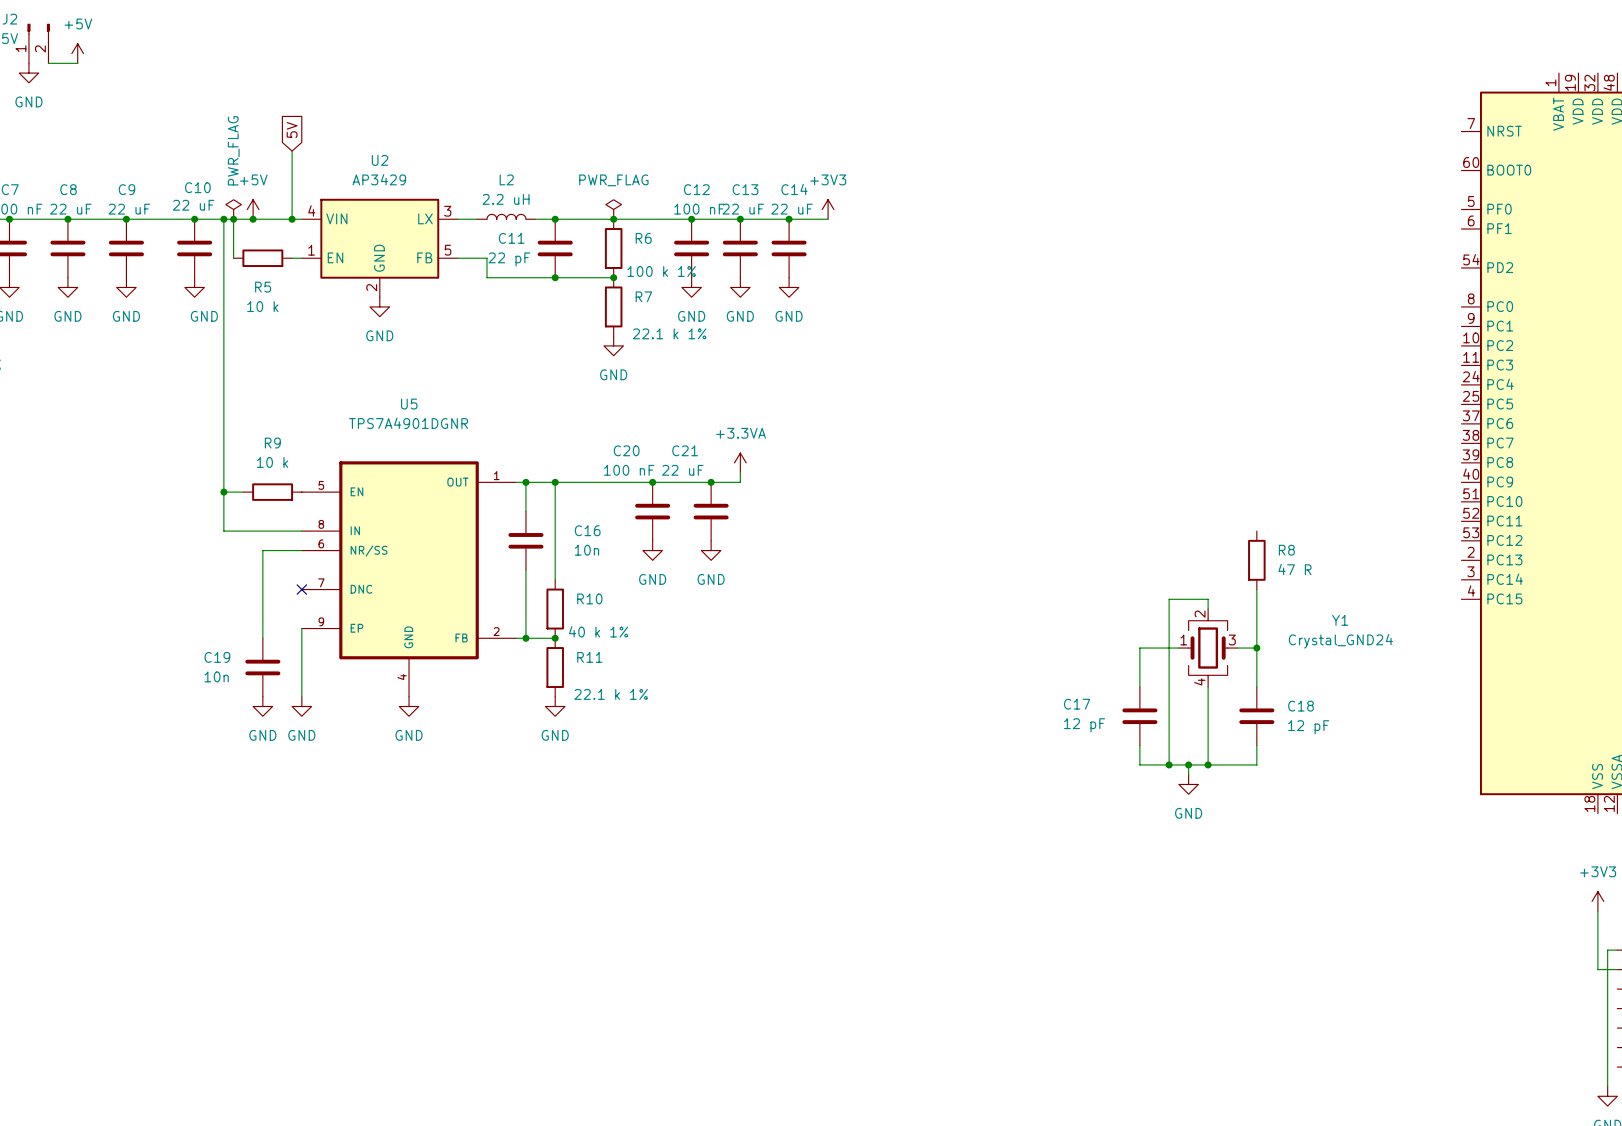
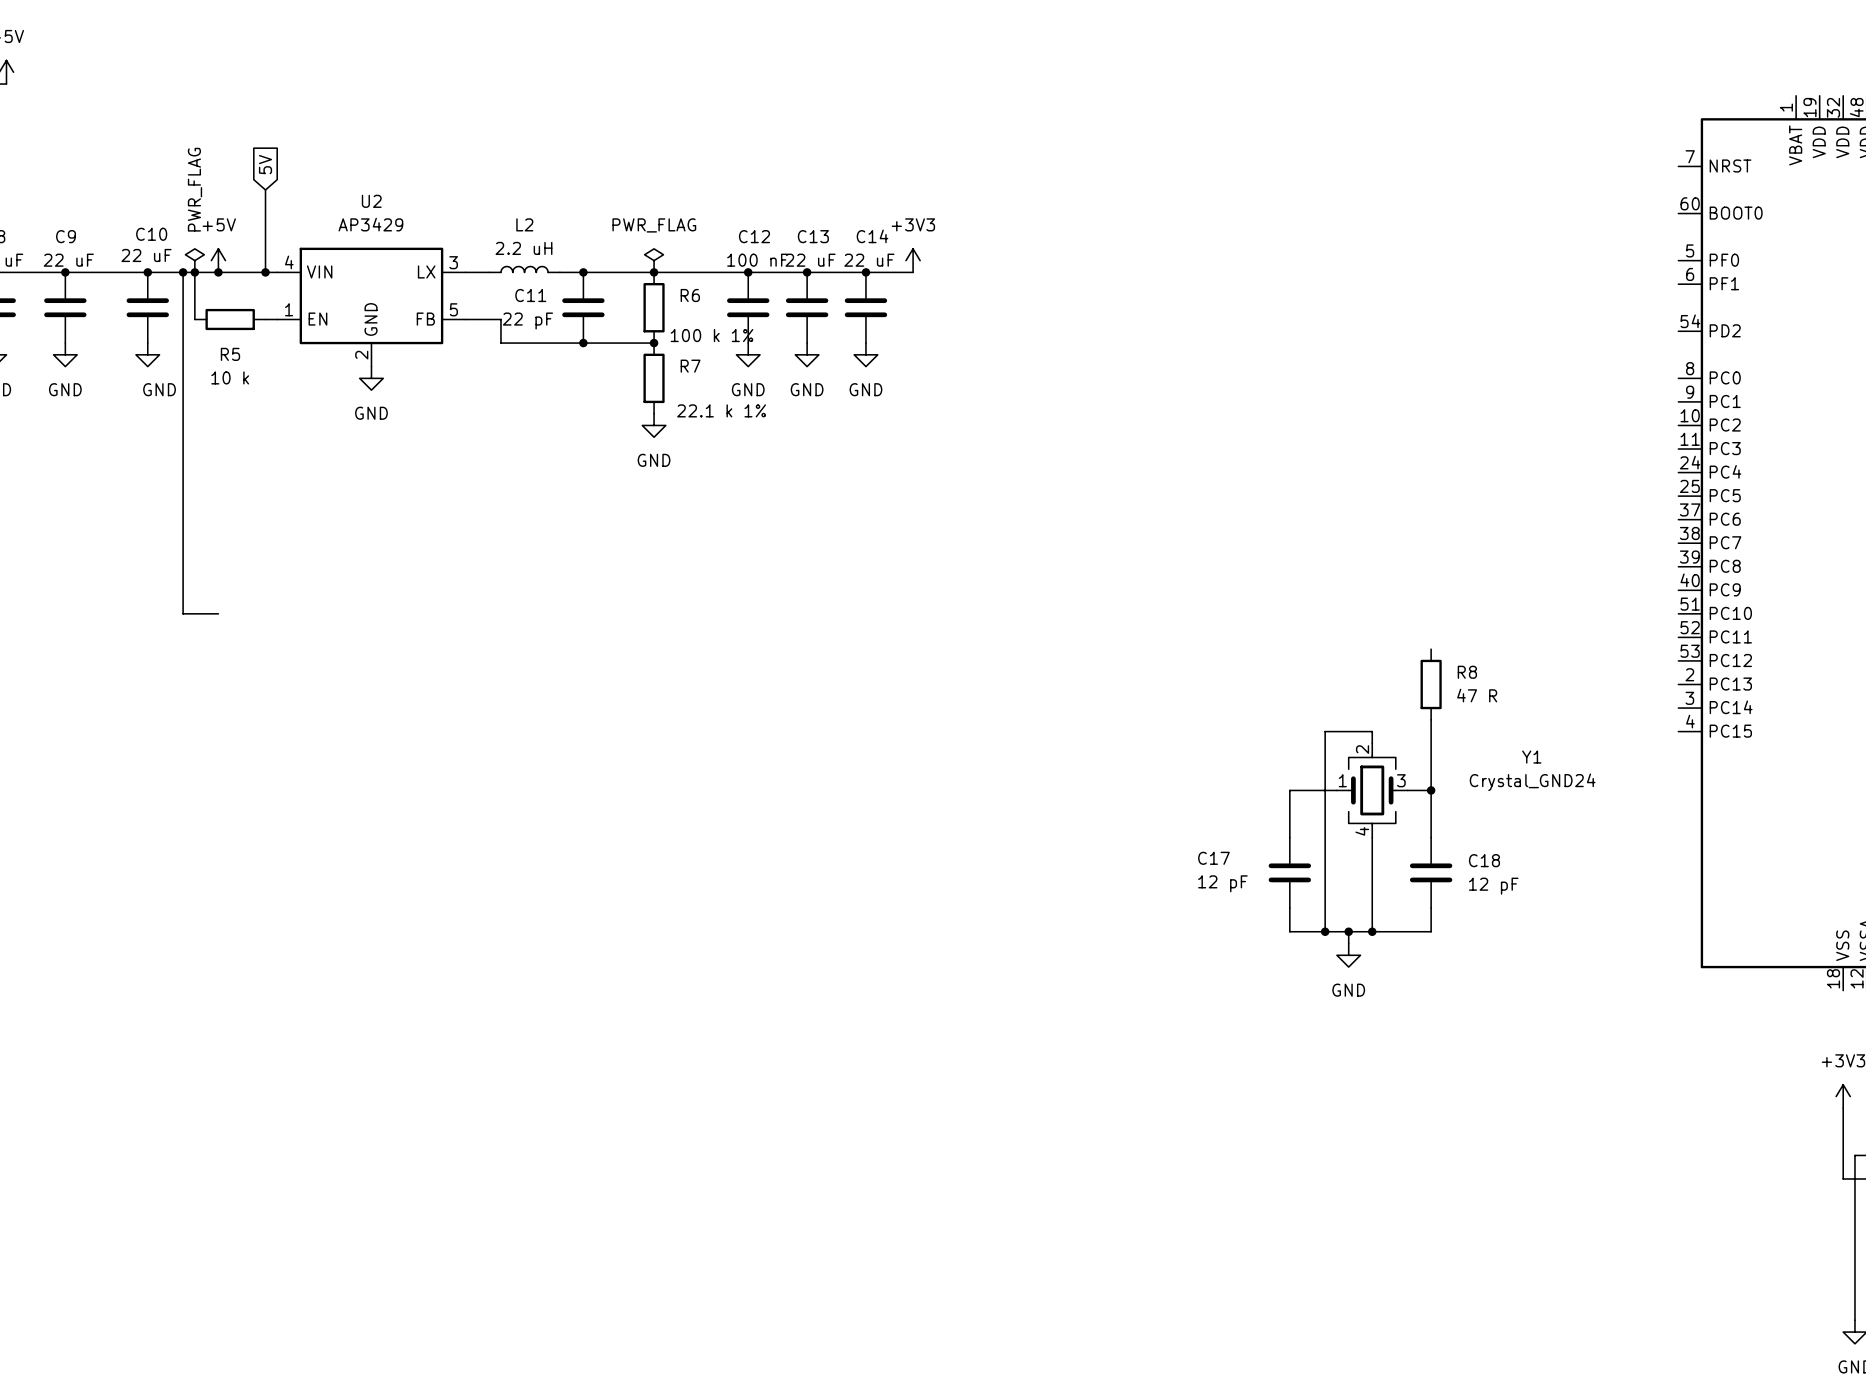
power symbol: +3.3VA (740, 462) -> none
wire: (740, 472) (740, 482) (516, 482) -> none
wire: (525, 482) (525, 511) -> none
junction: (525, 482) -> none
wire: (555, 482) (555, 579) -> none
junction: (555, 482) -> none
junction: (652, 482) -> none
junction: (711, 482) -> none
wire: (223, 492) (243, 492) -> none
junction: (223, 492) -> none
R9: 10 k (272, 492) -> none
wire: (223, 501) (223, 531) (301, 531) -> (183, 613) (218, 613)
C20: 100 nF (652, 511) -> none
C21: 22 uF (711, 511) -> none
C16: 10n (525, 540) -> none
wire: (301, 550) (262, 550) (262, 638) -> none
power symbol: GND (652, 550) -> none
power symbol: GND (711, 550) -> none
wire: (525, 570) (525, 638) -> none
U5: TPS7A4901DGNR (409, 579) -> none
no-connect mark: (301, 589) -> none
R10: 40 k 1% (555, 609) -> none
wire: (301, 628) (301, 696) -> none
wire: (516, 638) (555, 638) -> none
junction: (525, 638) -> none
junction: (555, 638) -> none
C19: 10n (262, 667) -> none
R11: 22.1 k 1% (555, 667) -> none
power symbol: GND (262, 706) -> none
power symbol: GND (301, 706) -> none
power symbol: GND (409, 706) -> none
power symbol: GND (555, 706) -> none

